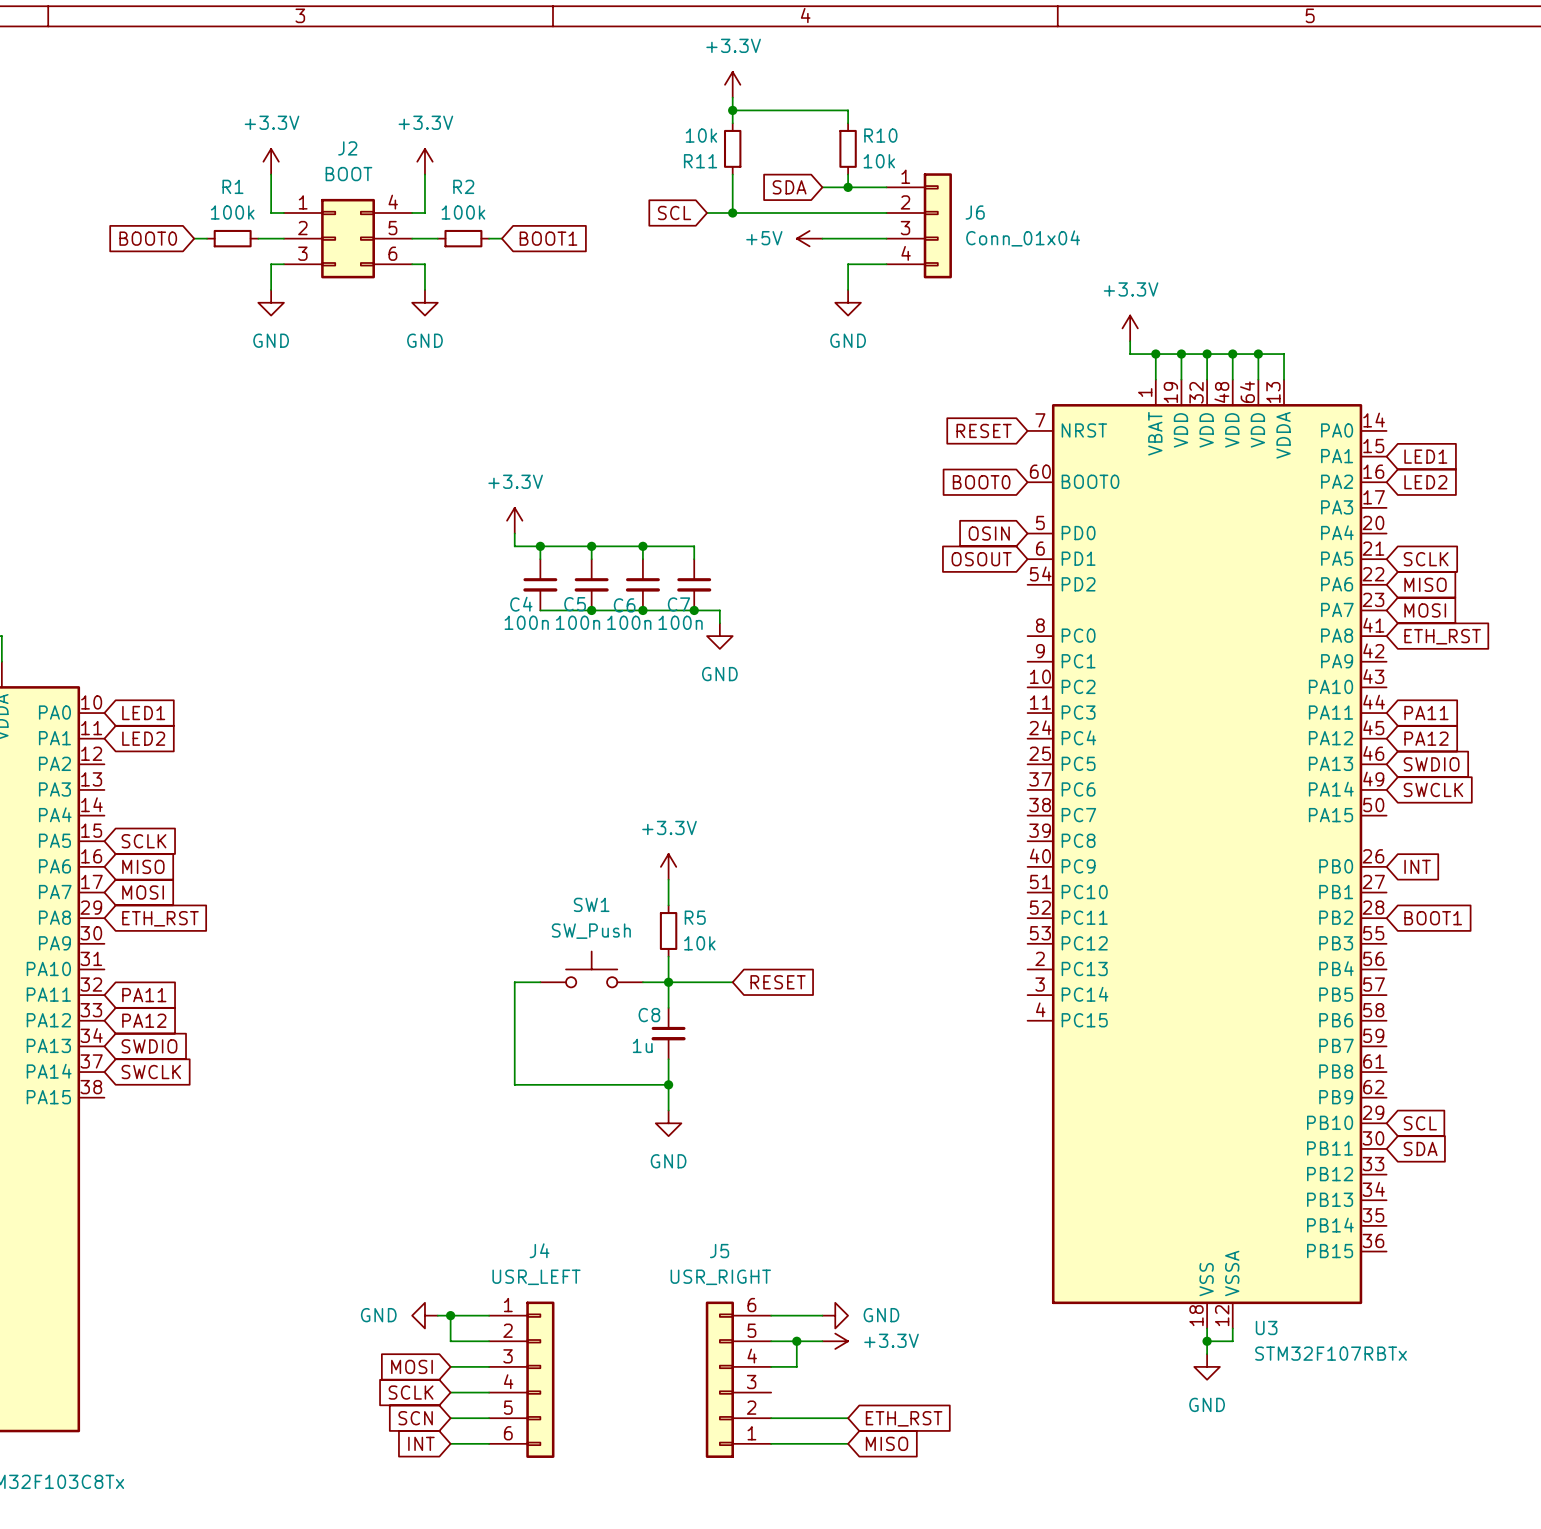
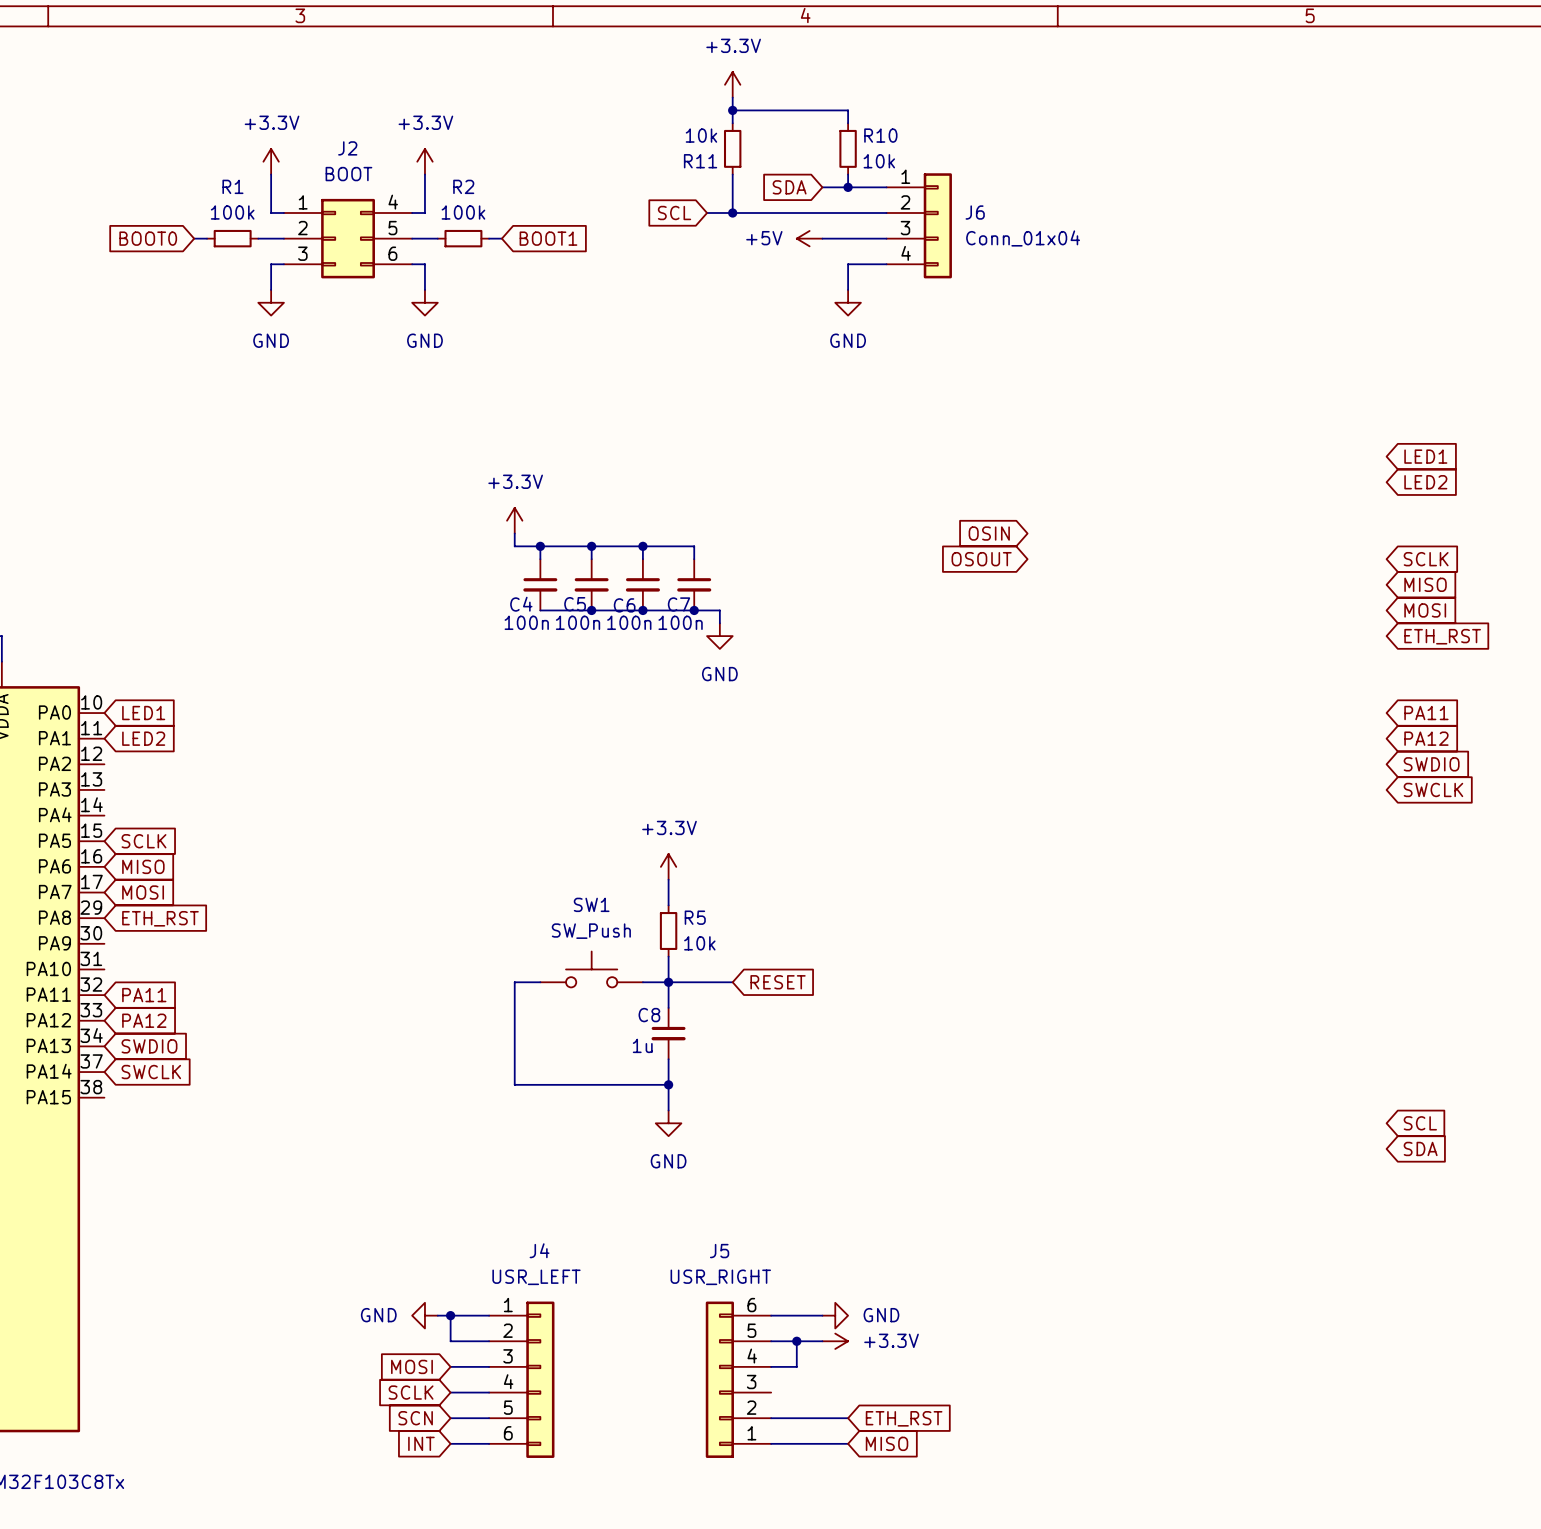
power symbol: +3.3V (1130, 328) -> none
wire: (1130, 341) (1130, 354) (1284, 354) (1284, 379) -> none
wire: (1155, 354) (1155, 379) -> none
junction: (1155, 354) -> none
wire: (1181, 354) (1181, 379) -> none
junction: (1181, 354) -> none
wire: (1207, 354) (1207, 379) -> none
junction: (1207, 354) -> none
wire: (1232, 354) (1232, 379) -> none
junction: (1232, 354) -> none
wire: (1258, 354) (1258, 379) -> none
junction: (1258, 354) -> none
global label: RESET (984, 430) -> none
global label: BOOT0 (981, 482) -> none
U3: STM32F107RBTx (1207, 854) -> none
global label: INT (1417, 866) -> none
global label: BOOT1 (1433, 918) -> none
wire: (1207, 1328) (1207, 1354) -> none
wire: (1232, 1328) (1232, 1341) (1207, 1341) -> none
junction: (1207, 1341) -> none
power symbol: GND (1207, 1366) -> none

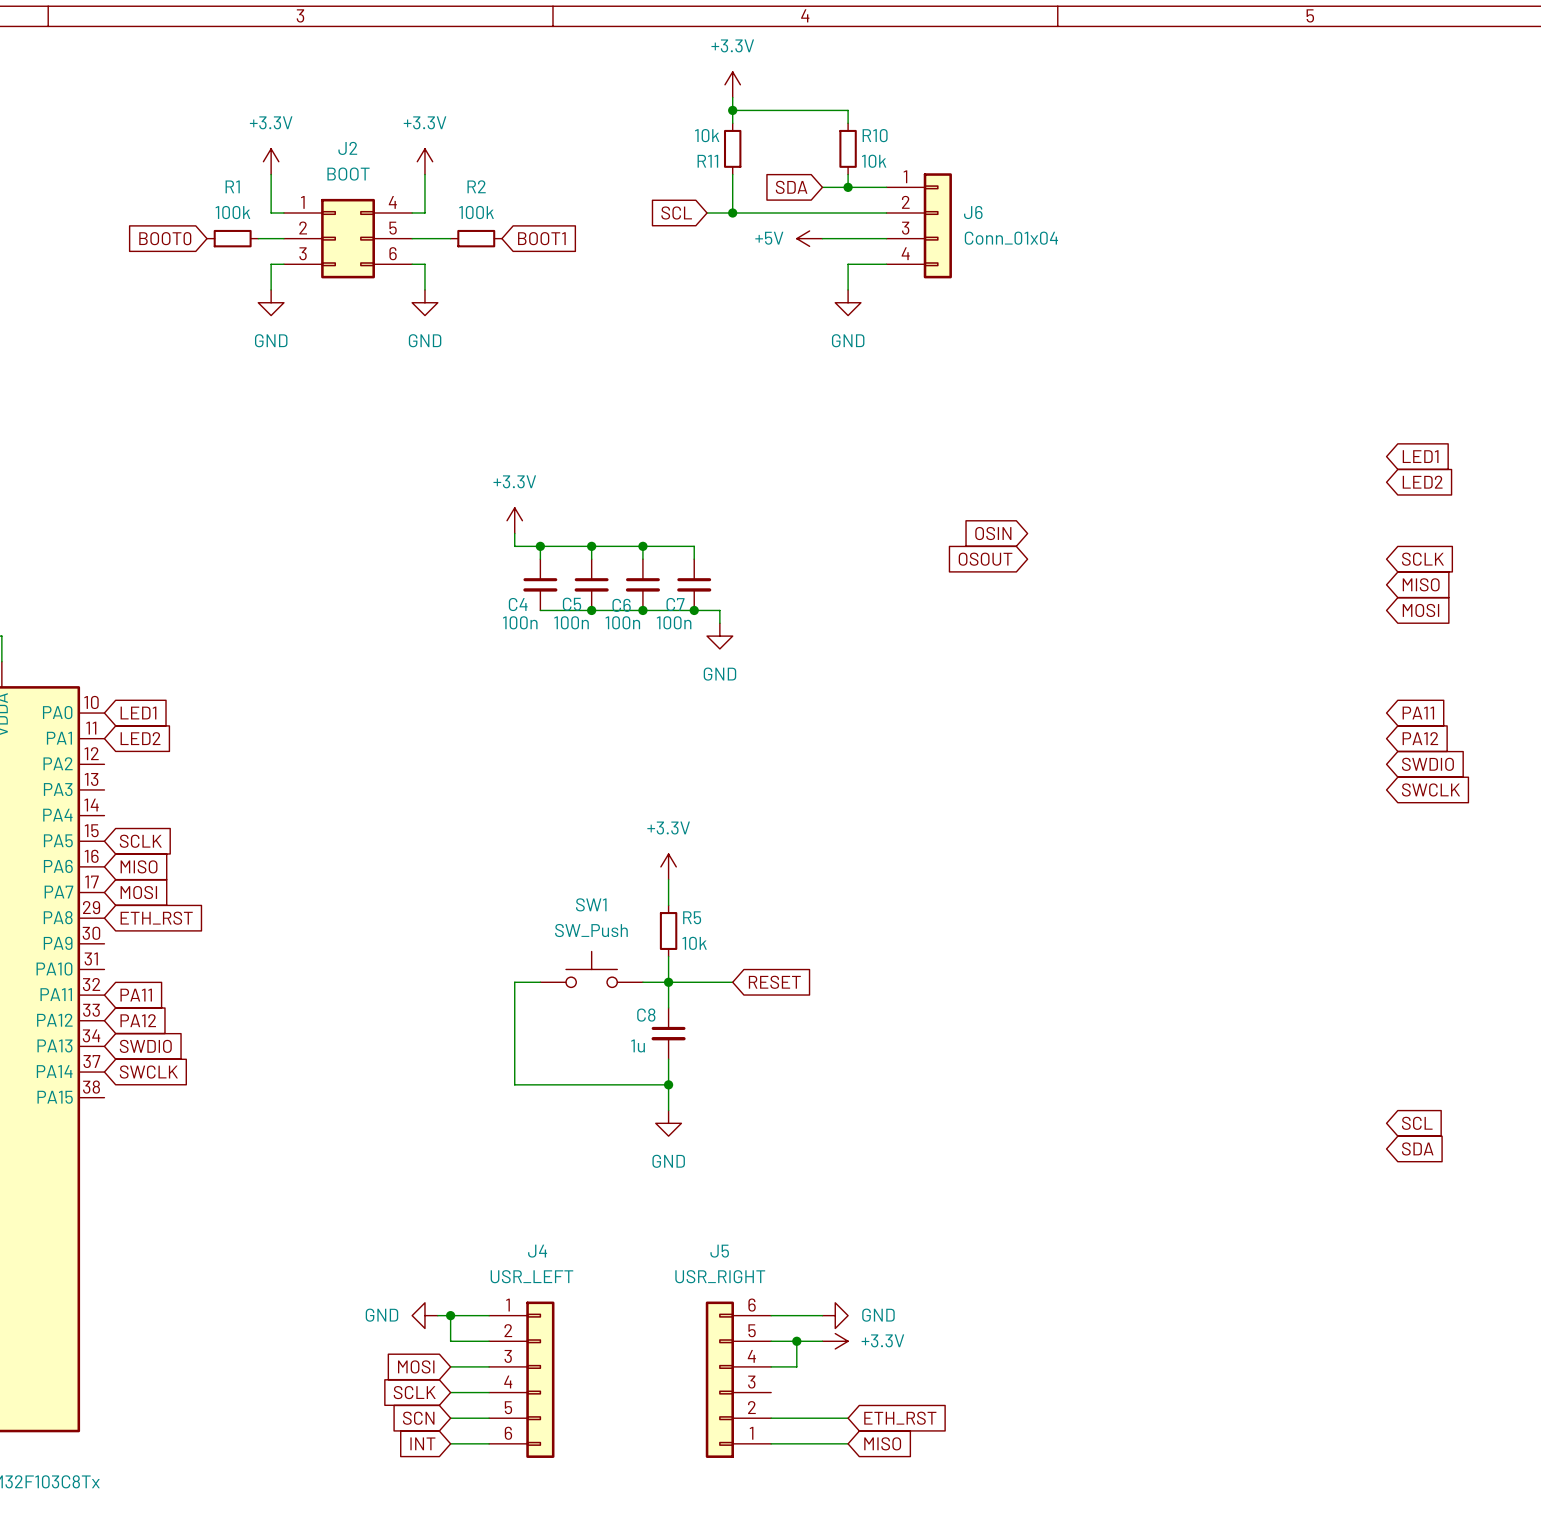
global label position: BOOT0 (148, 238) -> BOOT0 (165, 238)
wire: (194, 238) (207, 238) -> none
R2 position: (463, 238) -> (476, 238)
global label: ETH_RST (1442, 636) -> none

